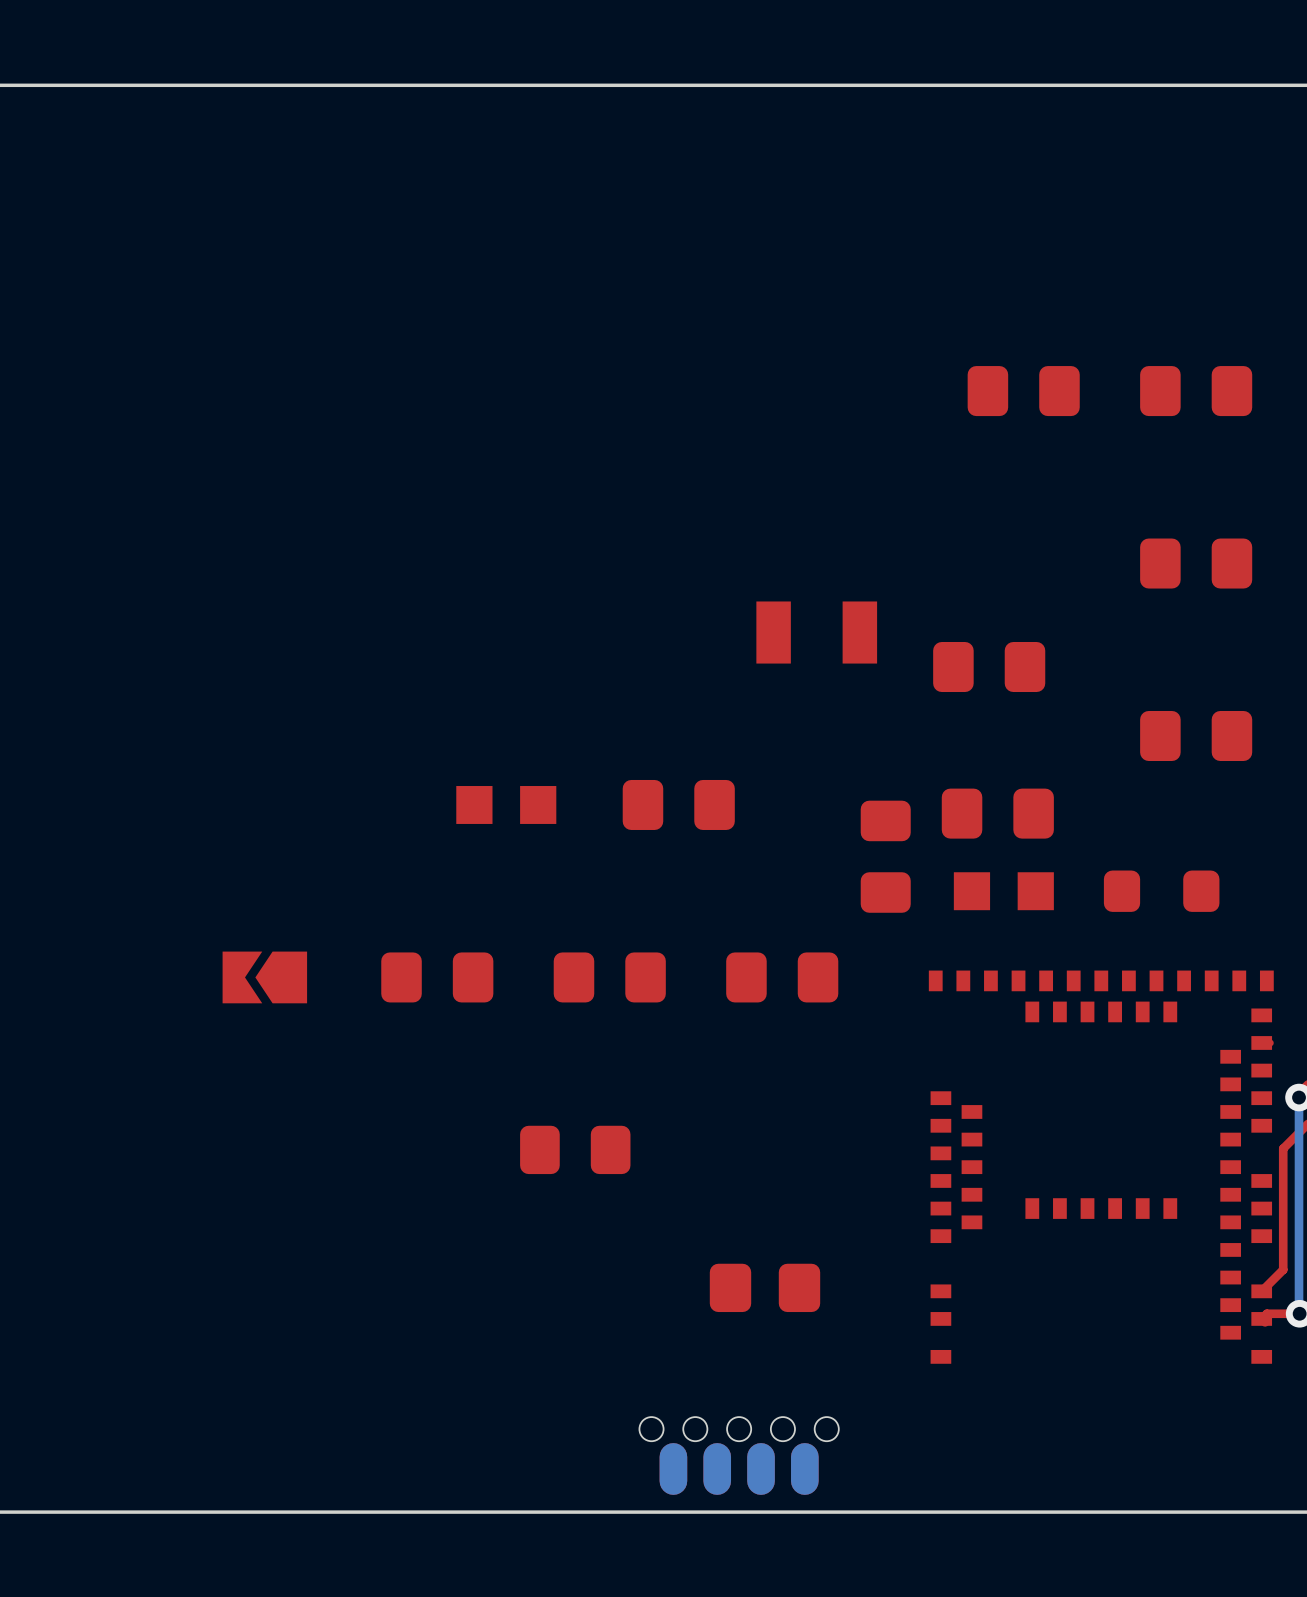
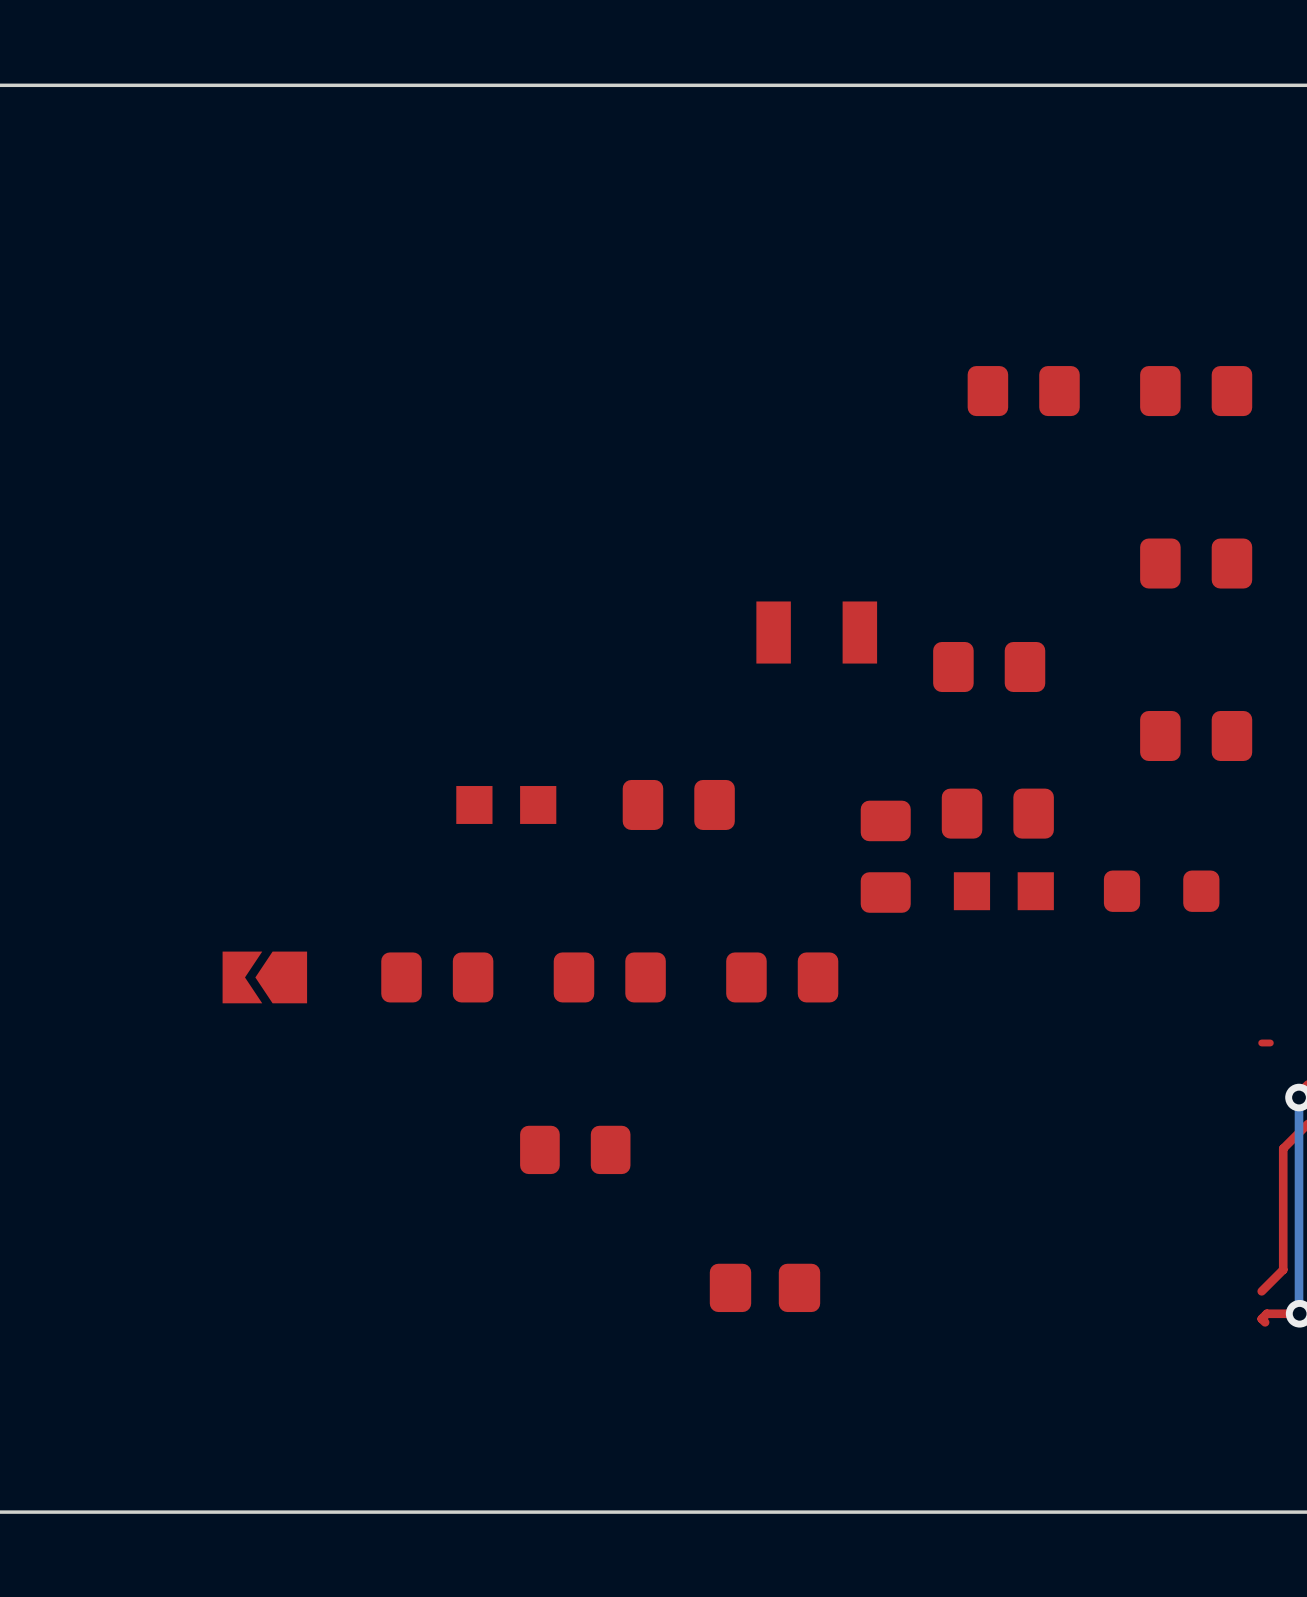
part: (1101, 1167) -> none
part: (739, 1455) -> none

